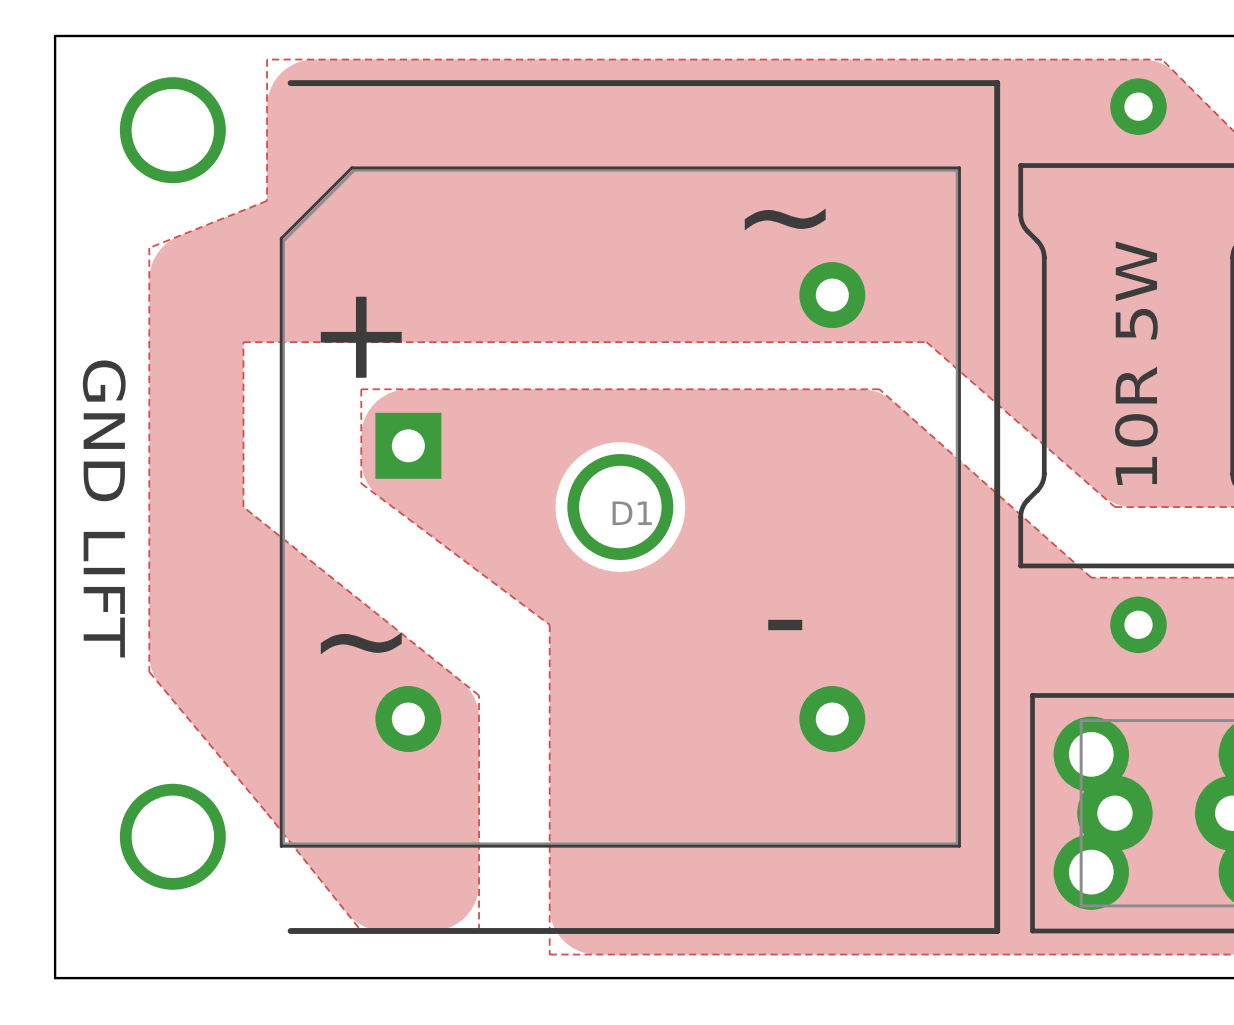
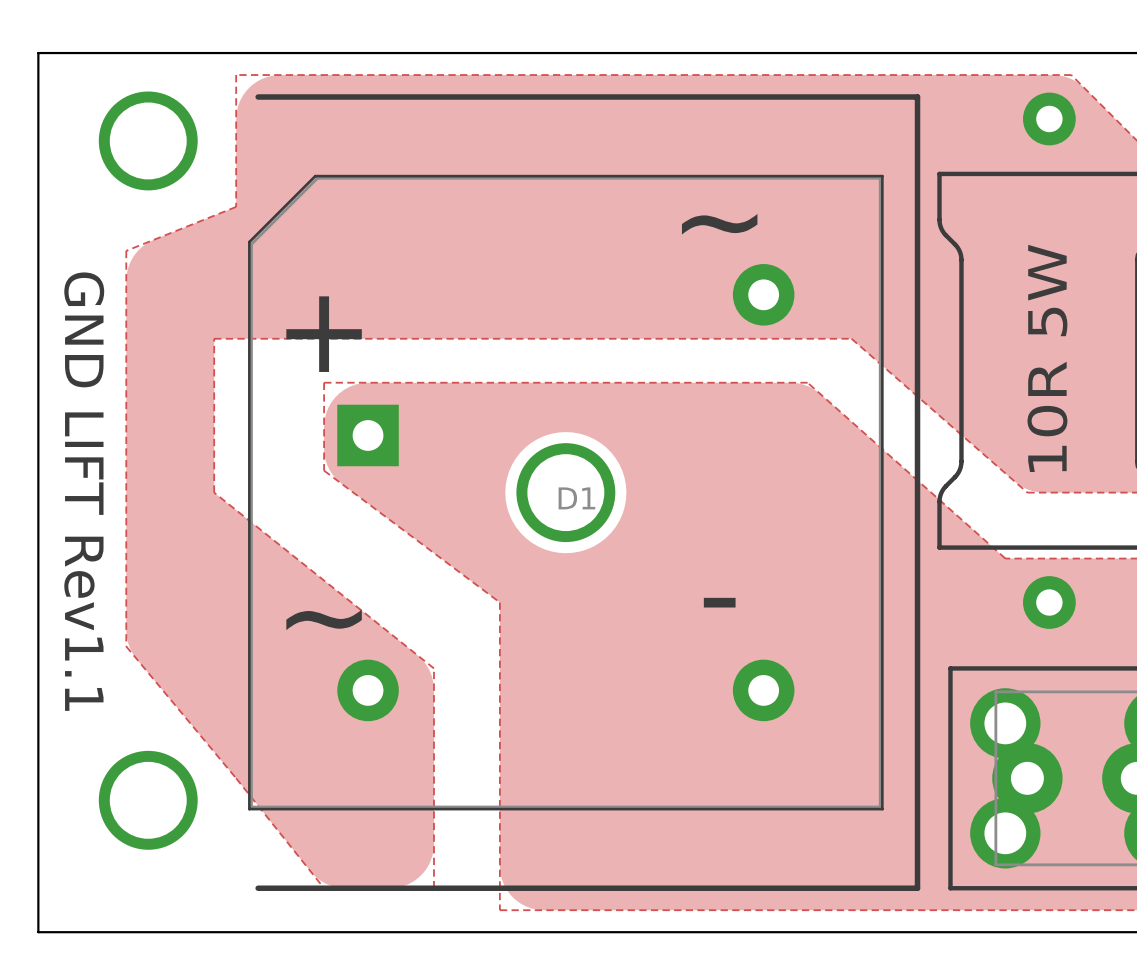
text: GND LIFT (104, 508) -> GND LIFT Rev1.1 (84, 491)

